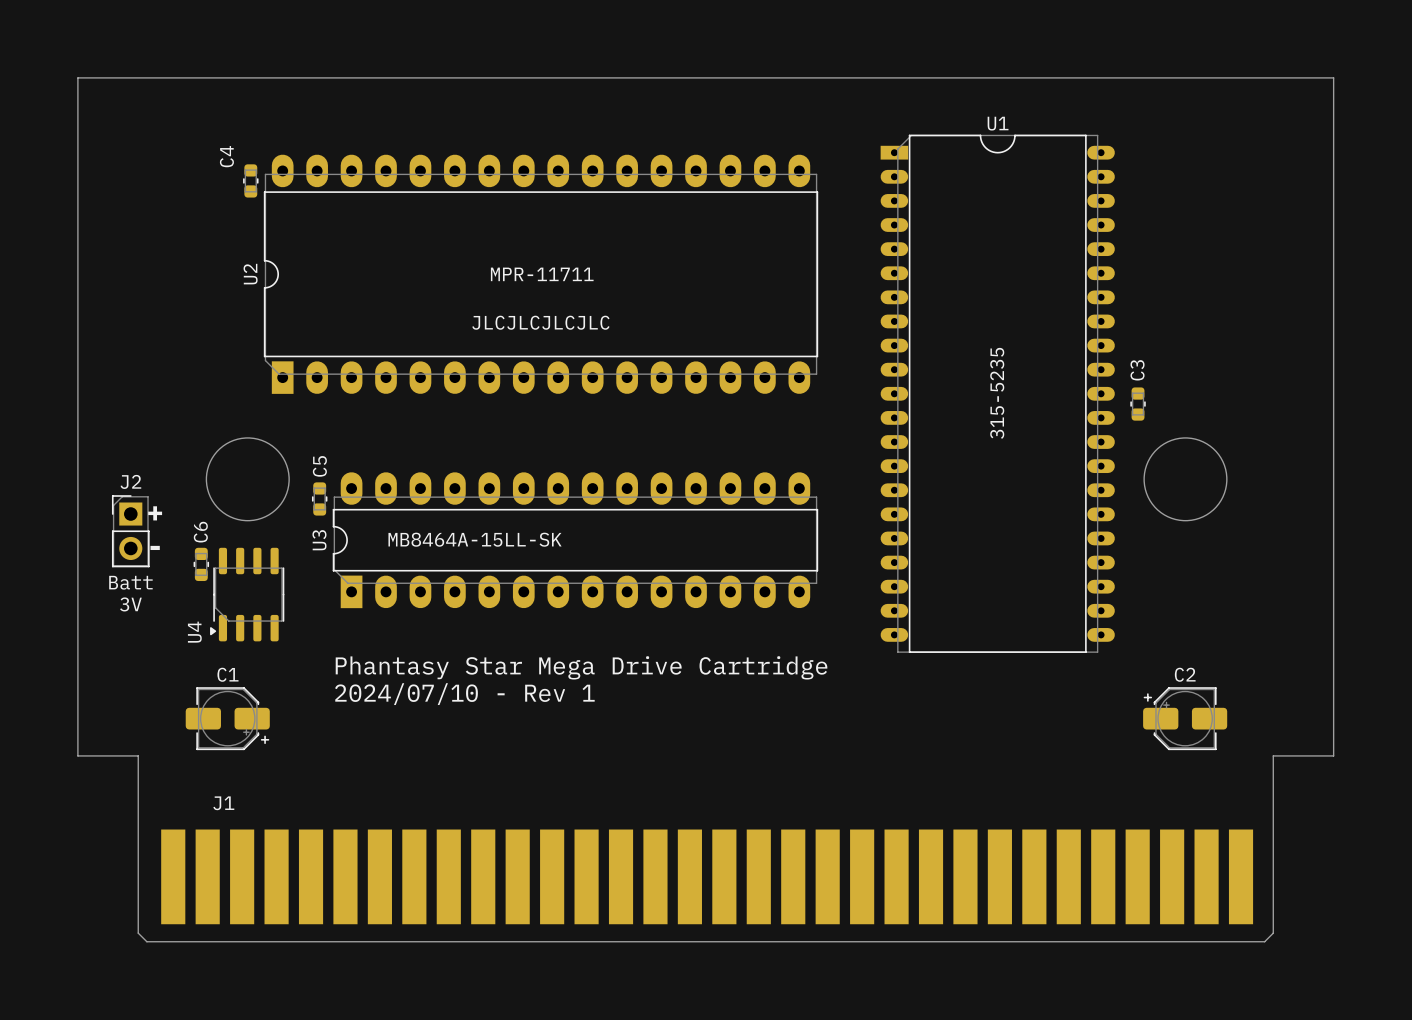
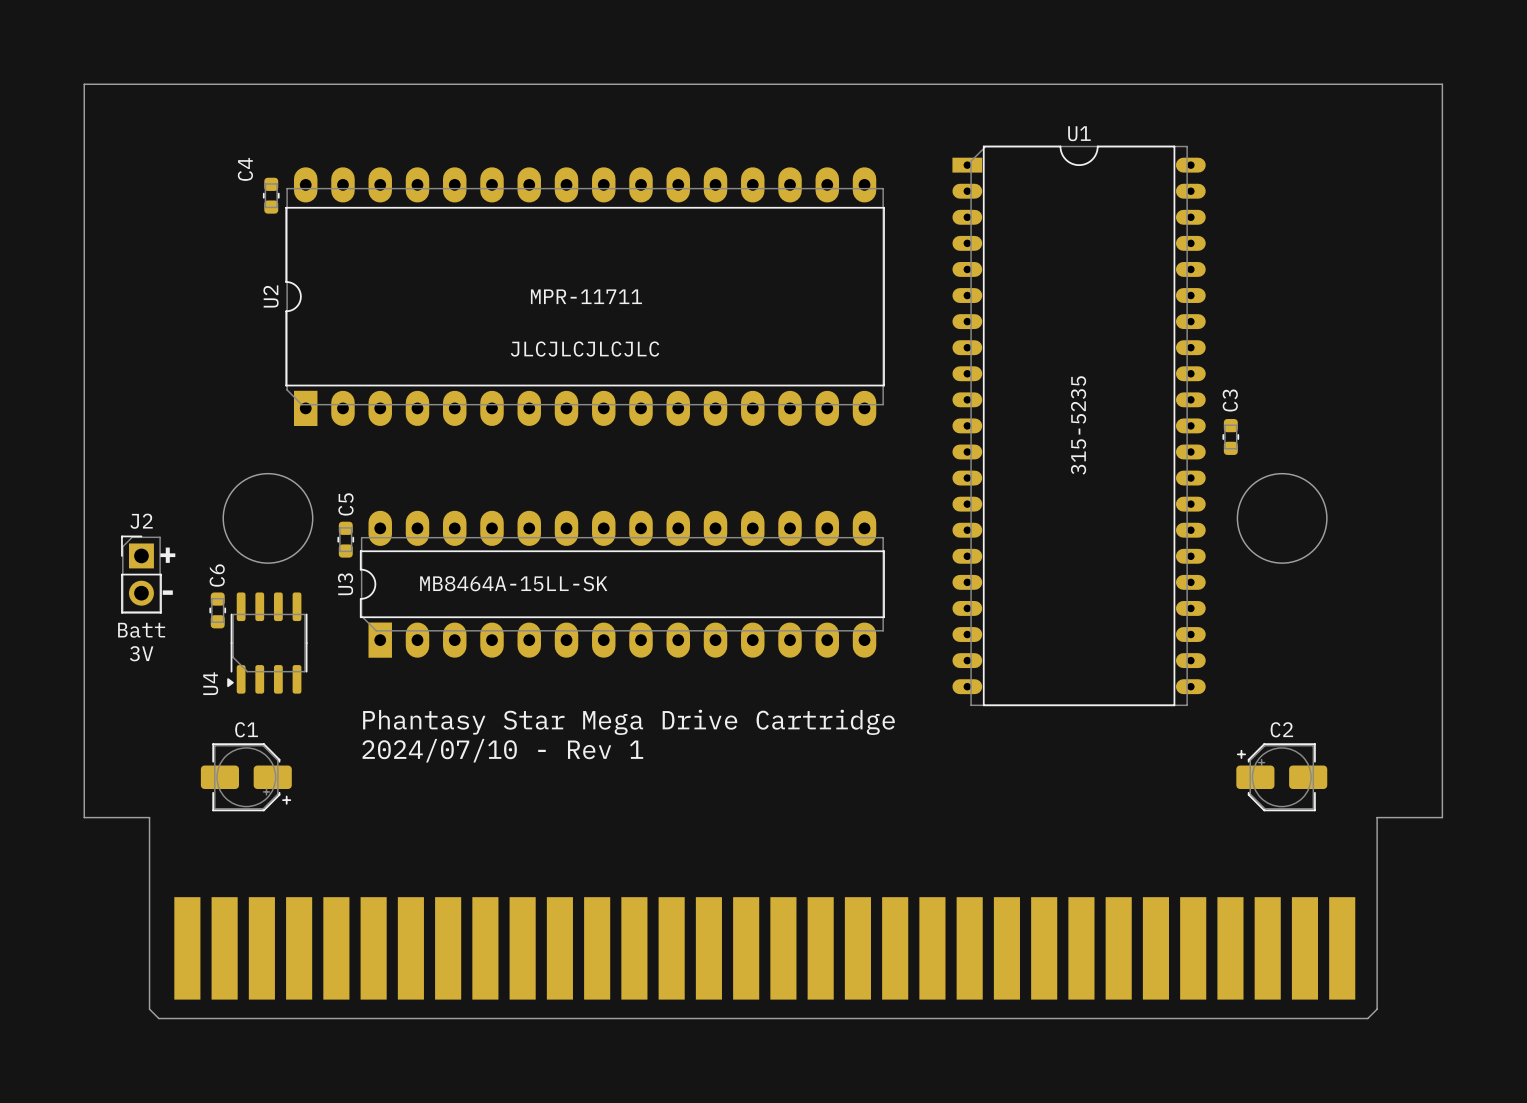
J1 name: J1 (223, 803) -> none

